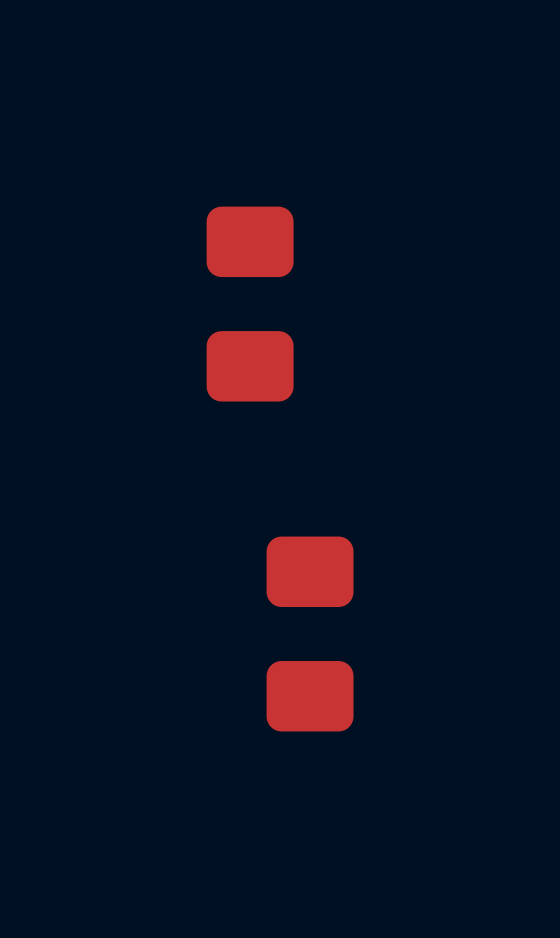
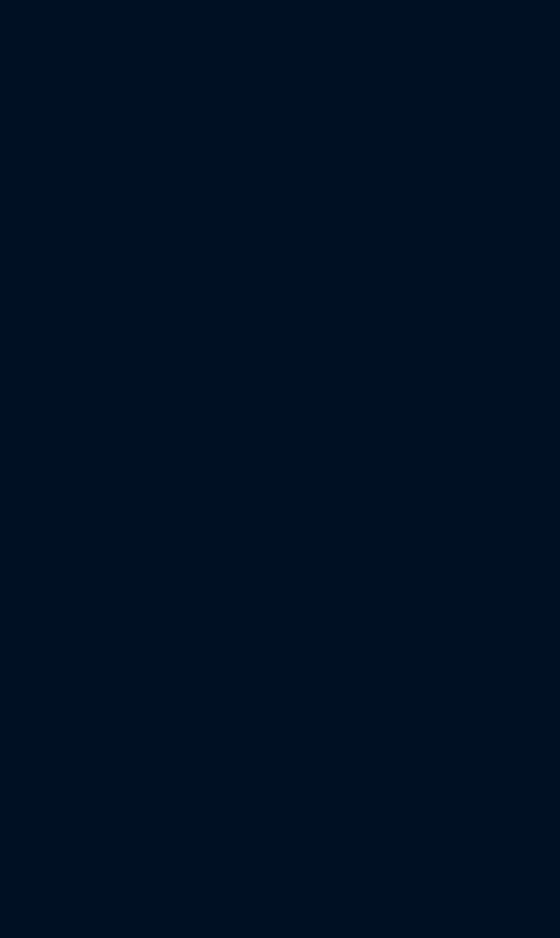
part: (250, 304) -> none
part: (310, 634) -> none

